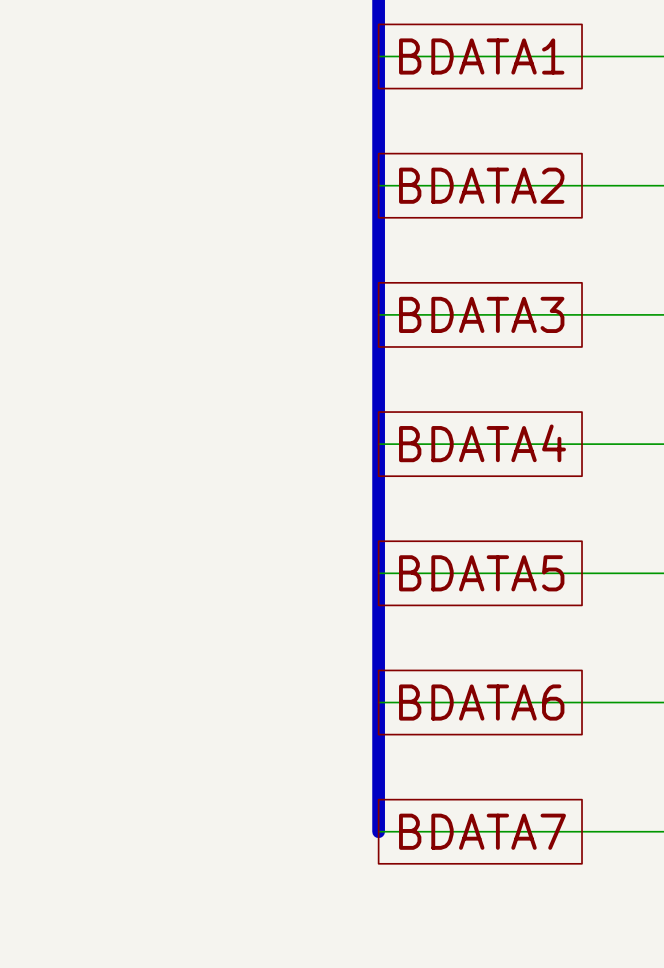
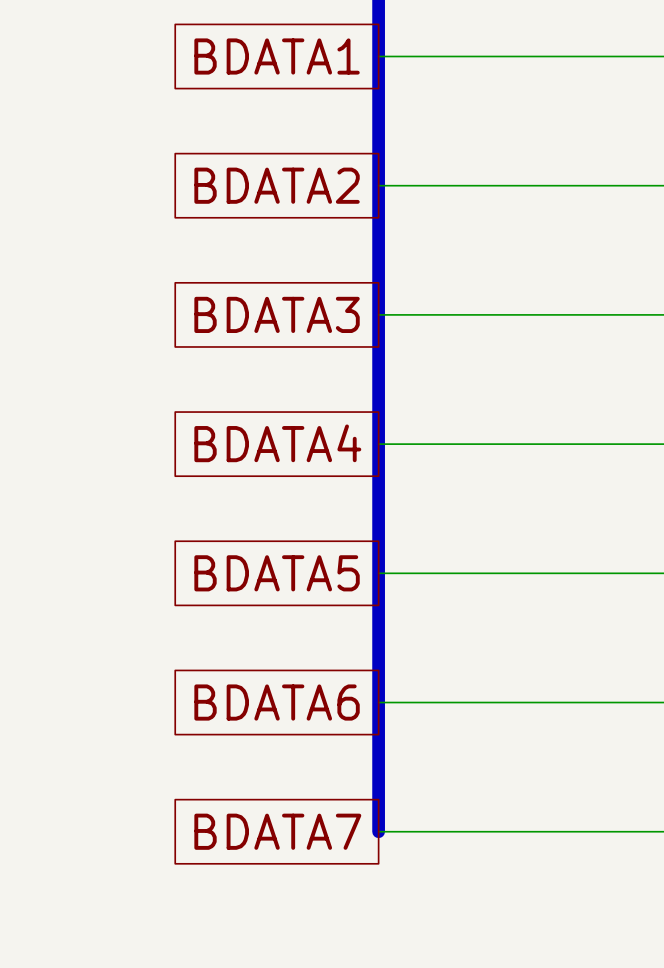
global label rotation: 0° (481, 56) -> 180° (277, 56)
global label rotation: 0° (481, 185) -> 180° (277, 185)
global label rotation: 0° (481, 314) -> 180° (277, 314)
global label rotation: 0° (482, 443) -> 180° (277, 443)
global label rotation: 0° (481, 573) -> 180° (277, 573)
global label rotation: 0° (481, 702) -> 180° (277, 702)
global label rotation: 0° (482, 831) -> 180° (277, 831)

